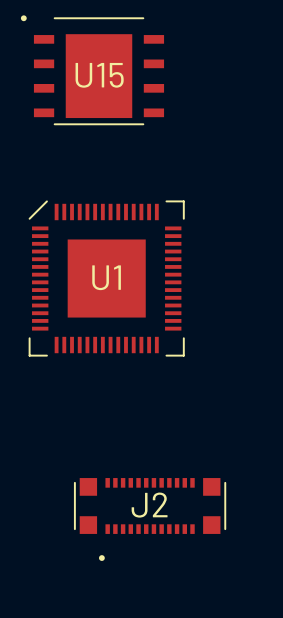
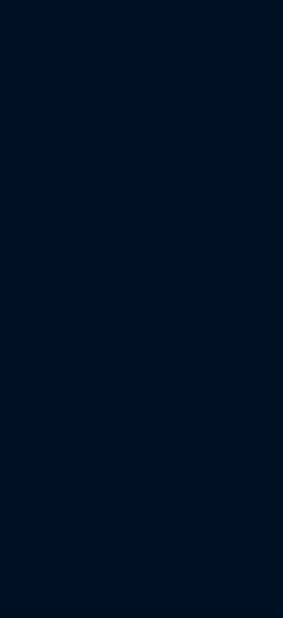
U15: (92, 70) -> none
U1: (106, 278) -> none
J2: (150, 519) -> none

